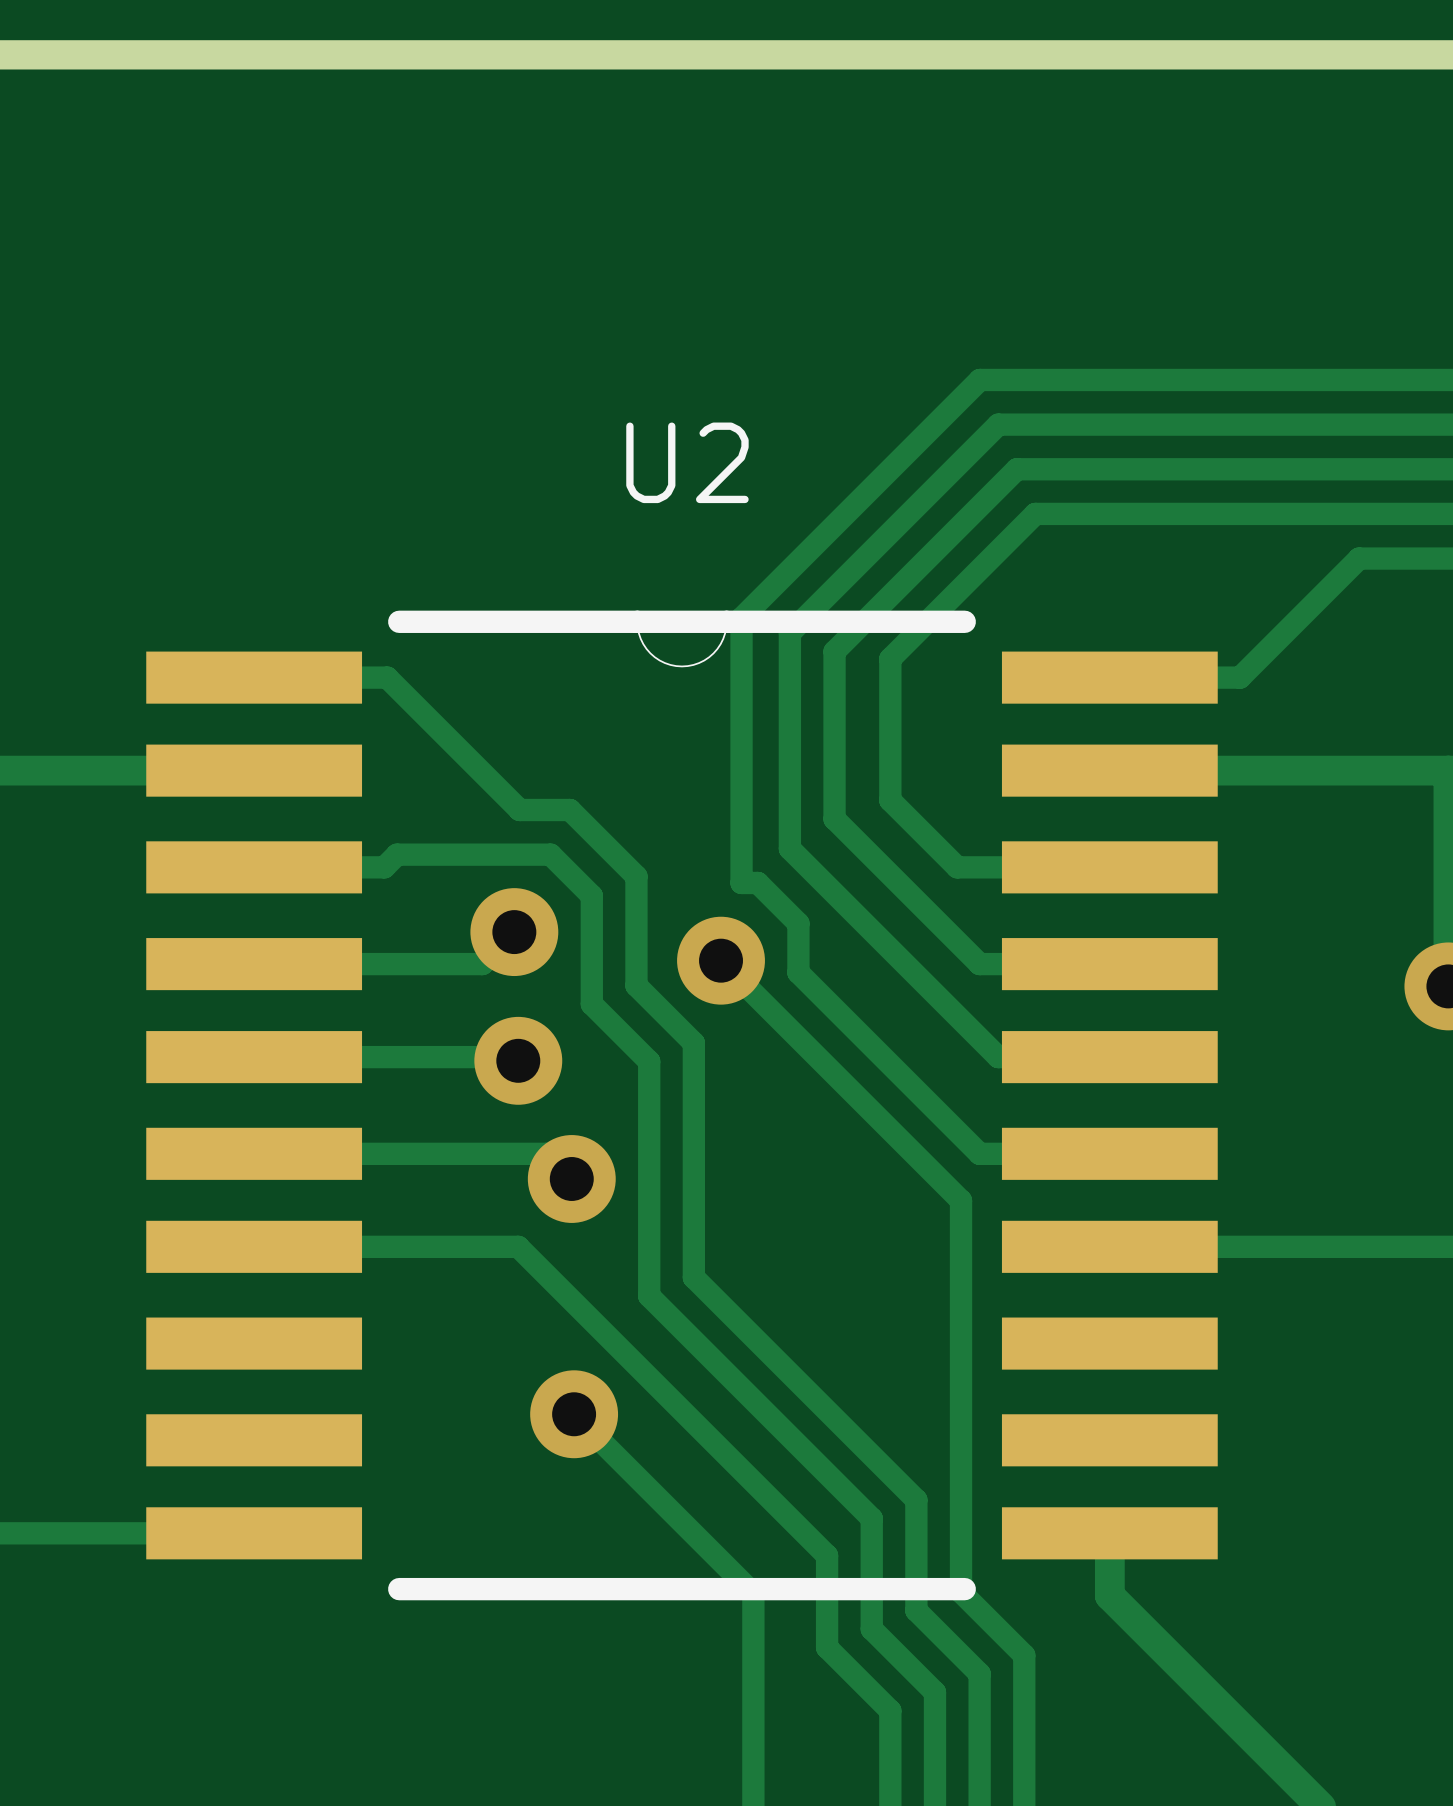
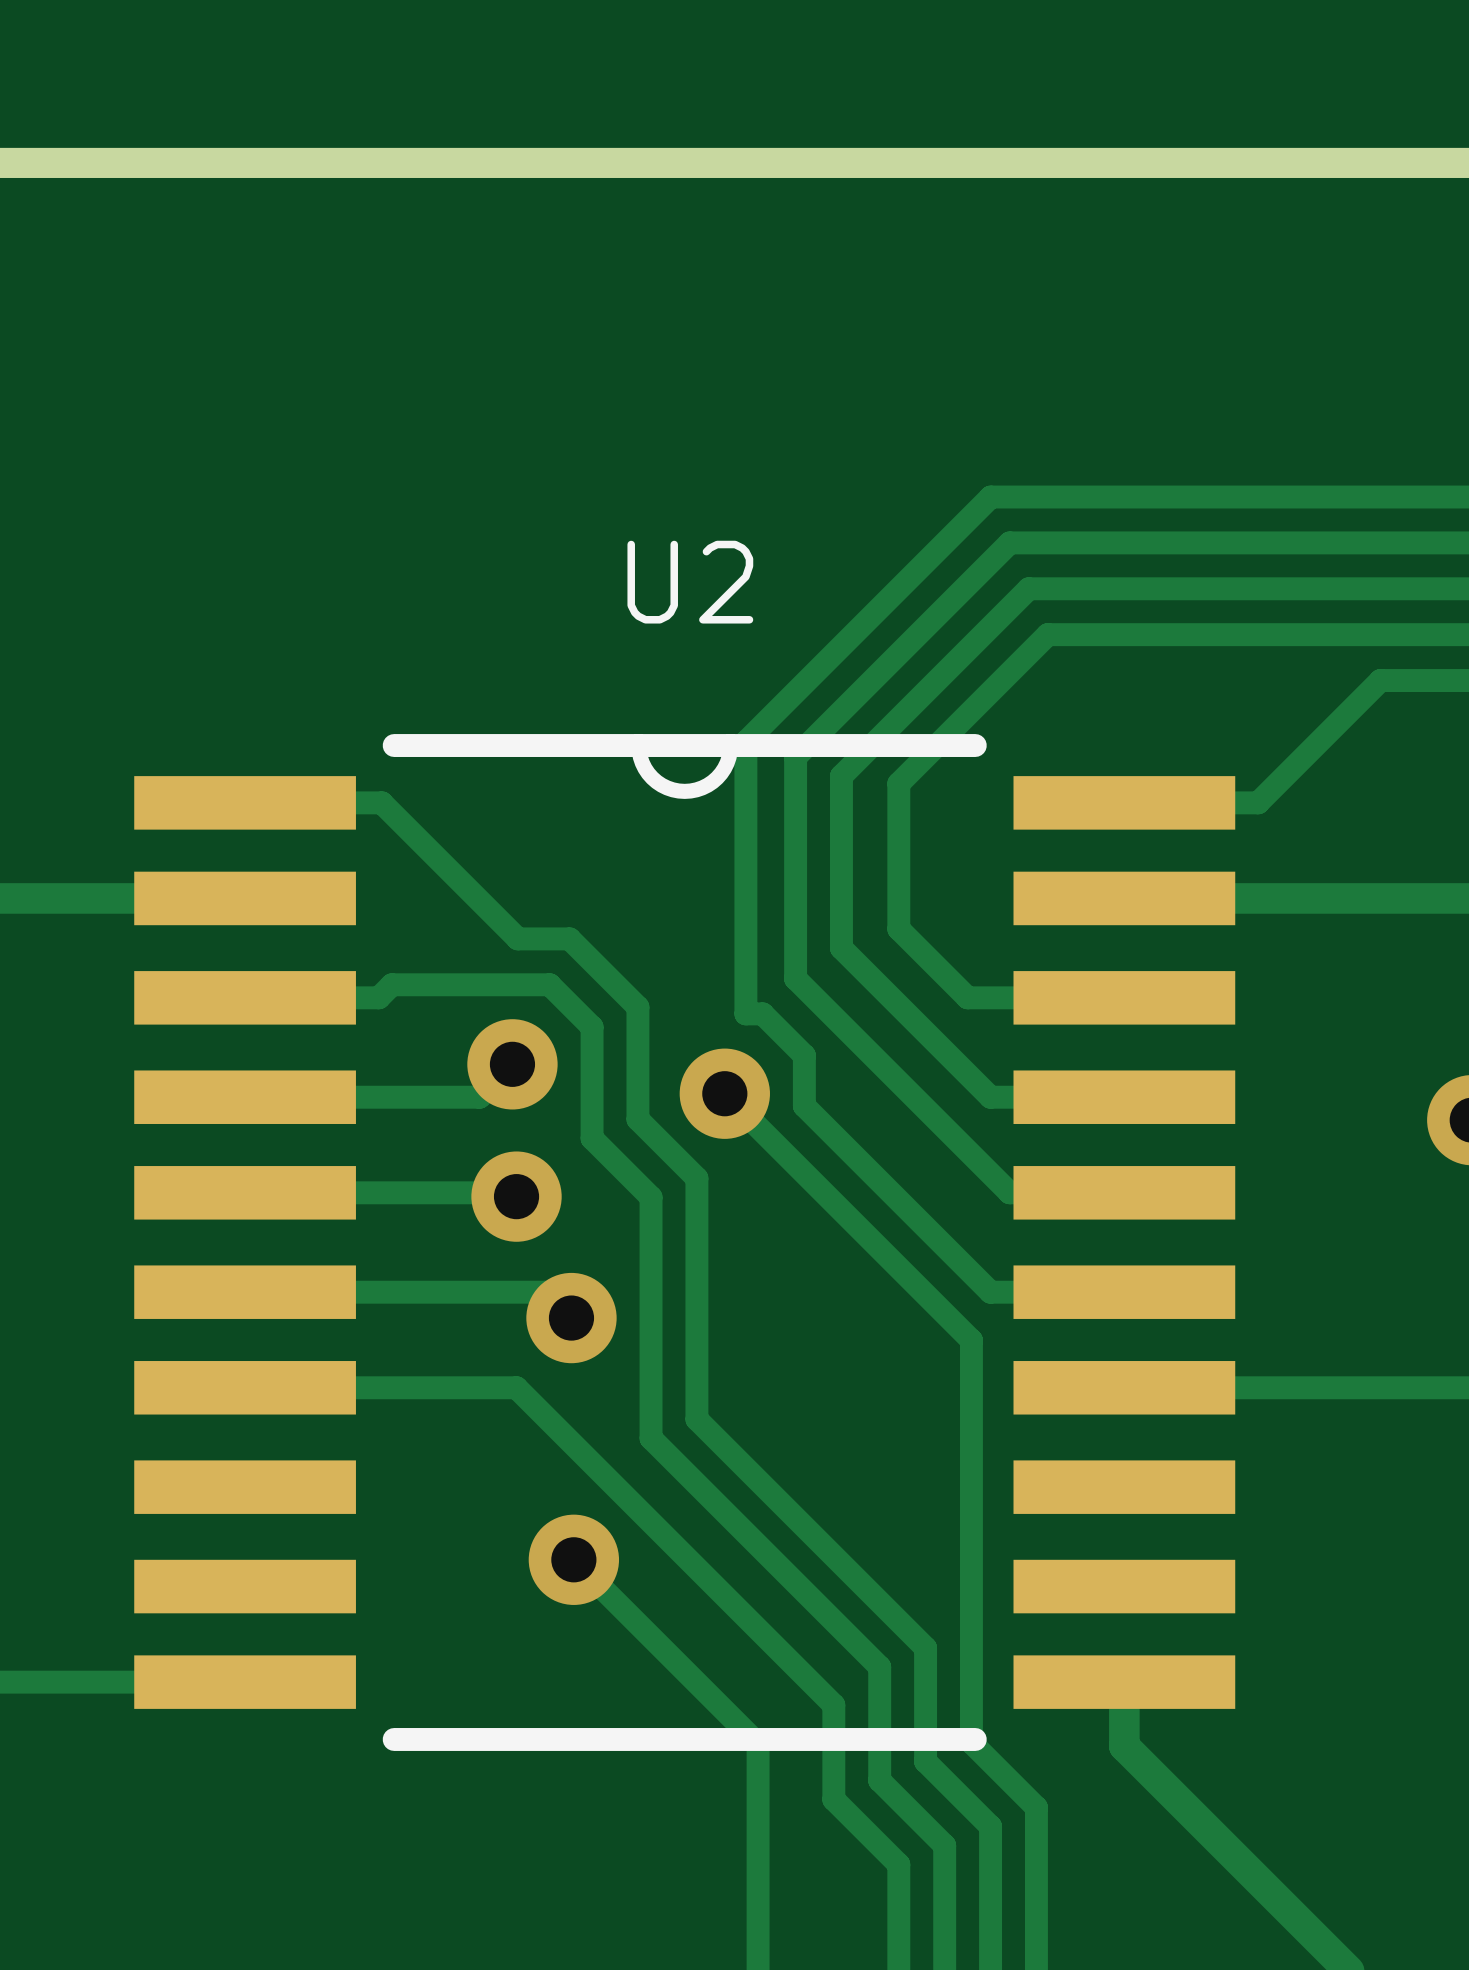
U2 footprint: [146, 610, 1218, 1601] -> [134, 734, 1236, 1751]

